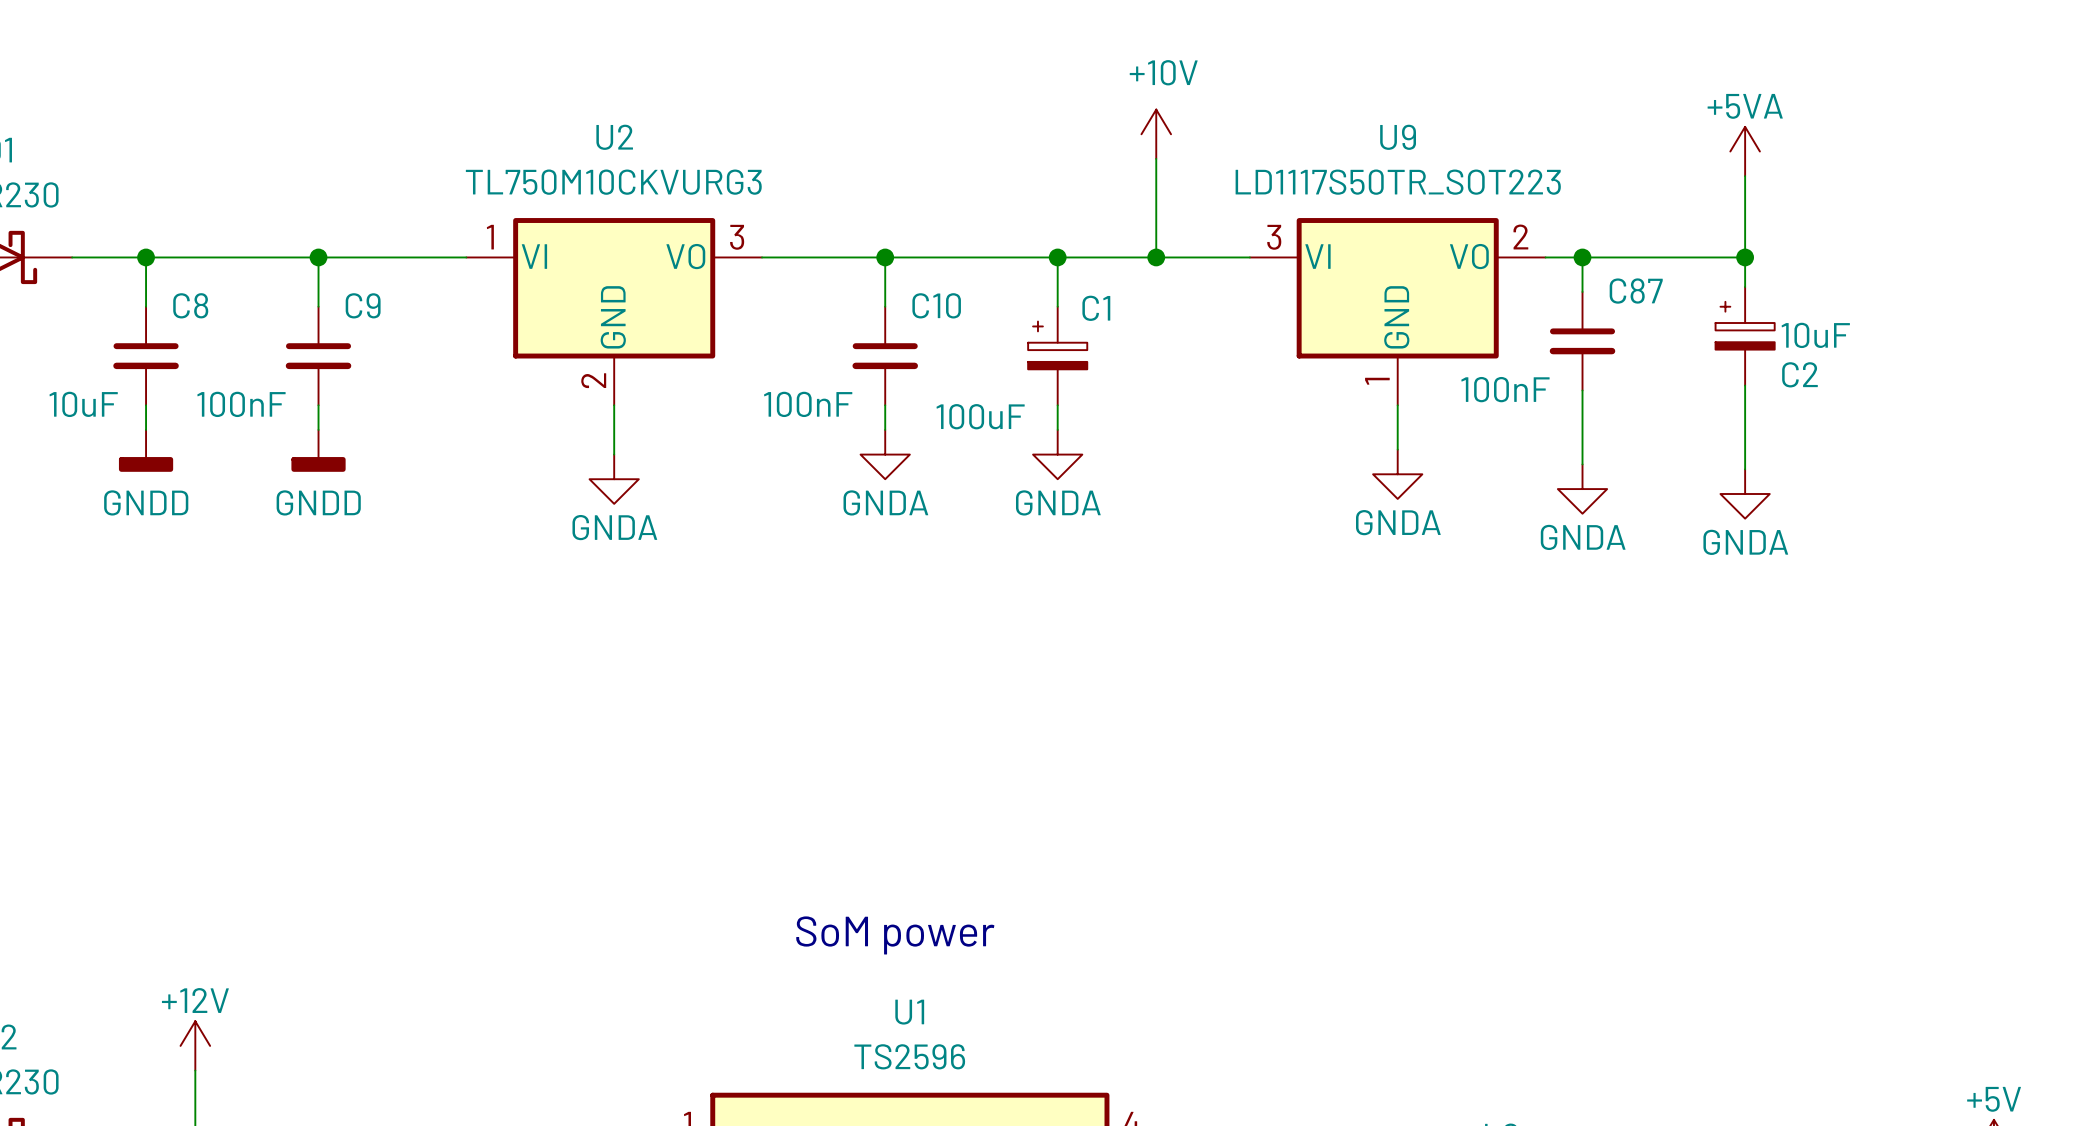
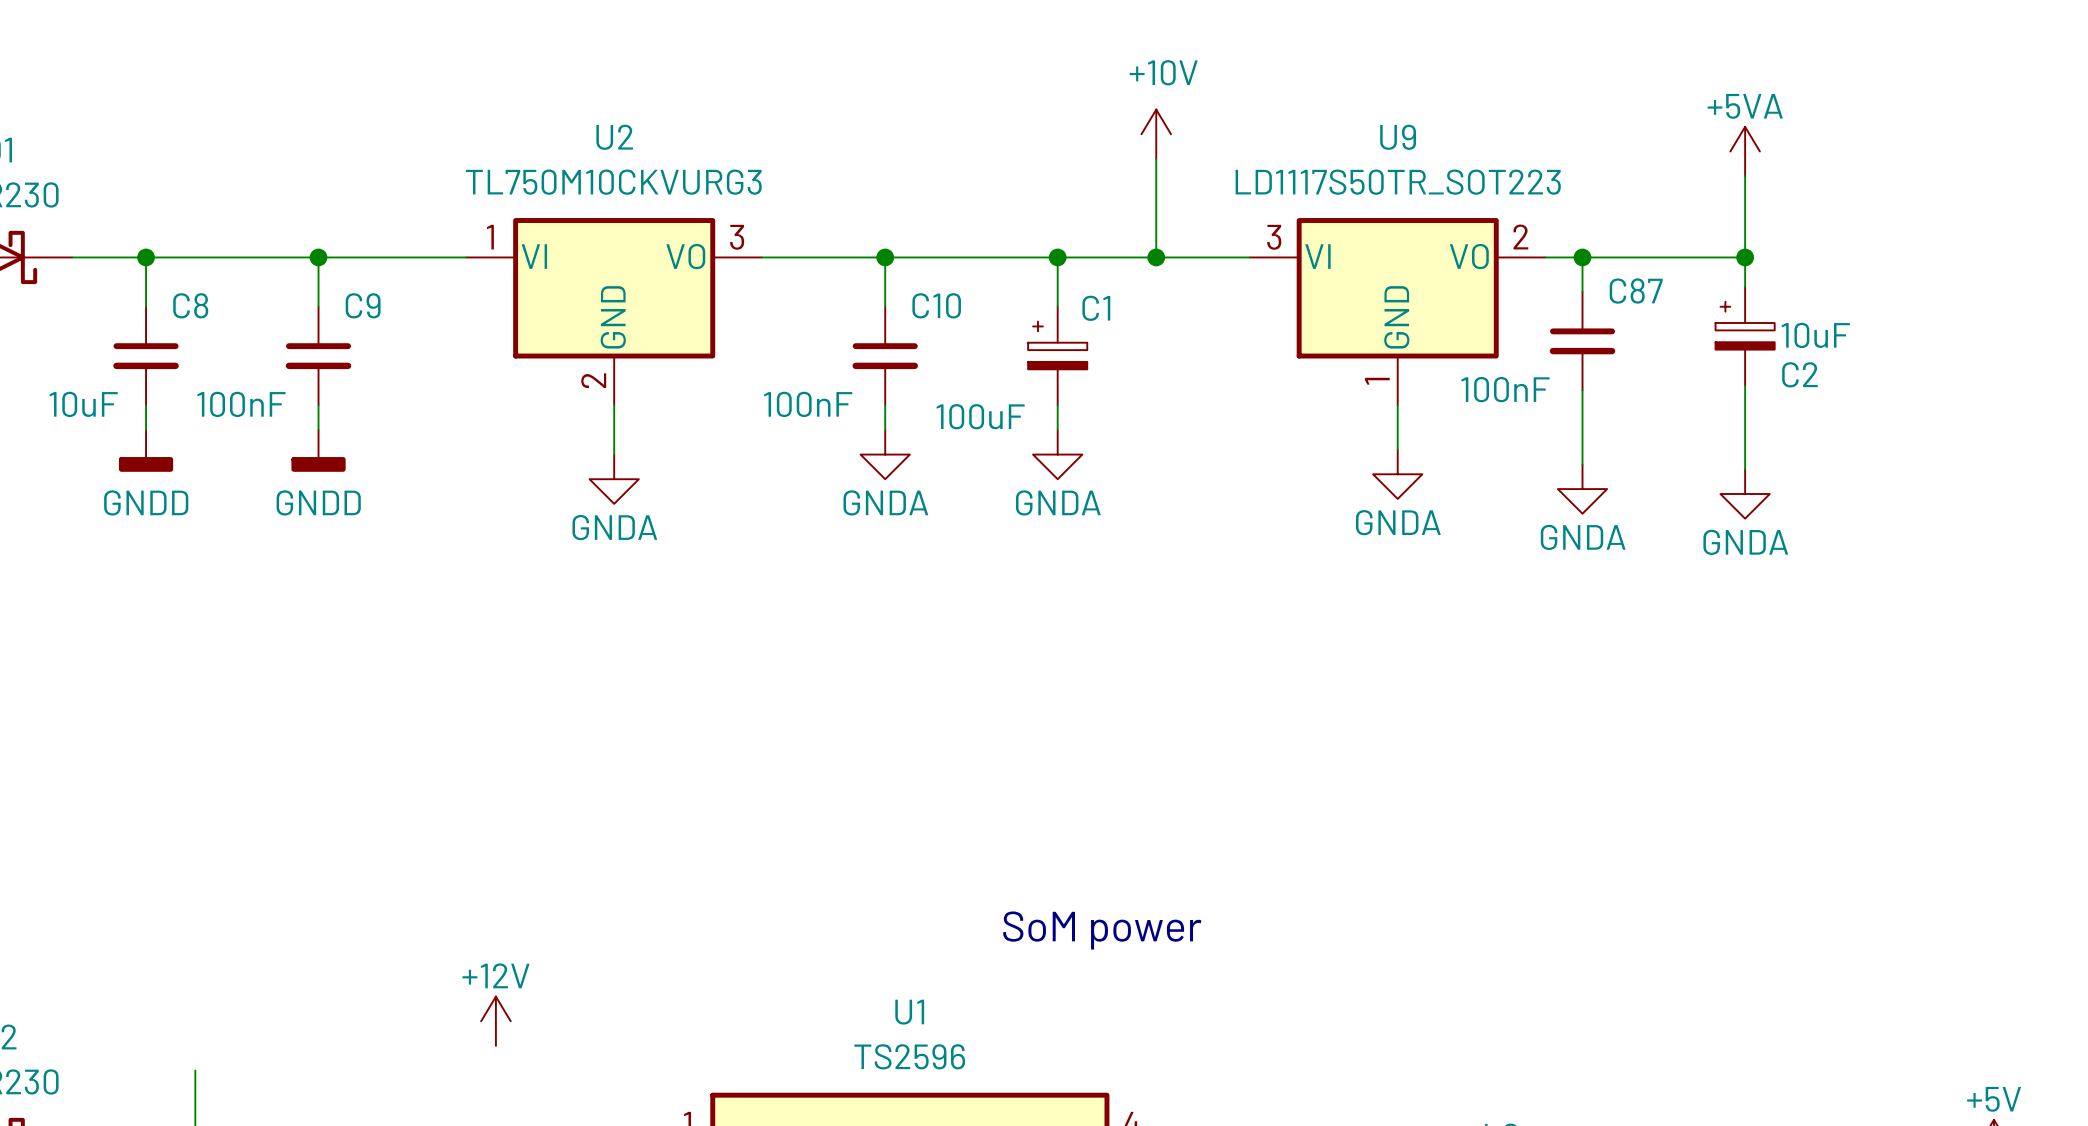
text position: SoM power (895, 935) -> SoM power (1102, 930)
power symbol position: +12V (195, 1045) -> +12V (495, 1021)

